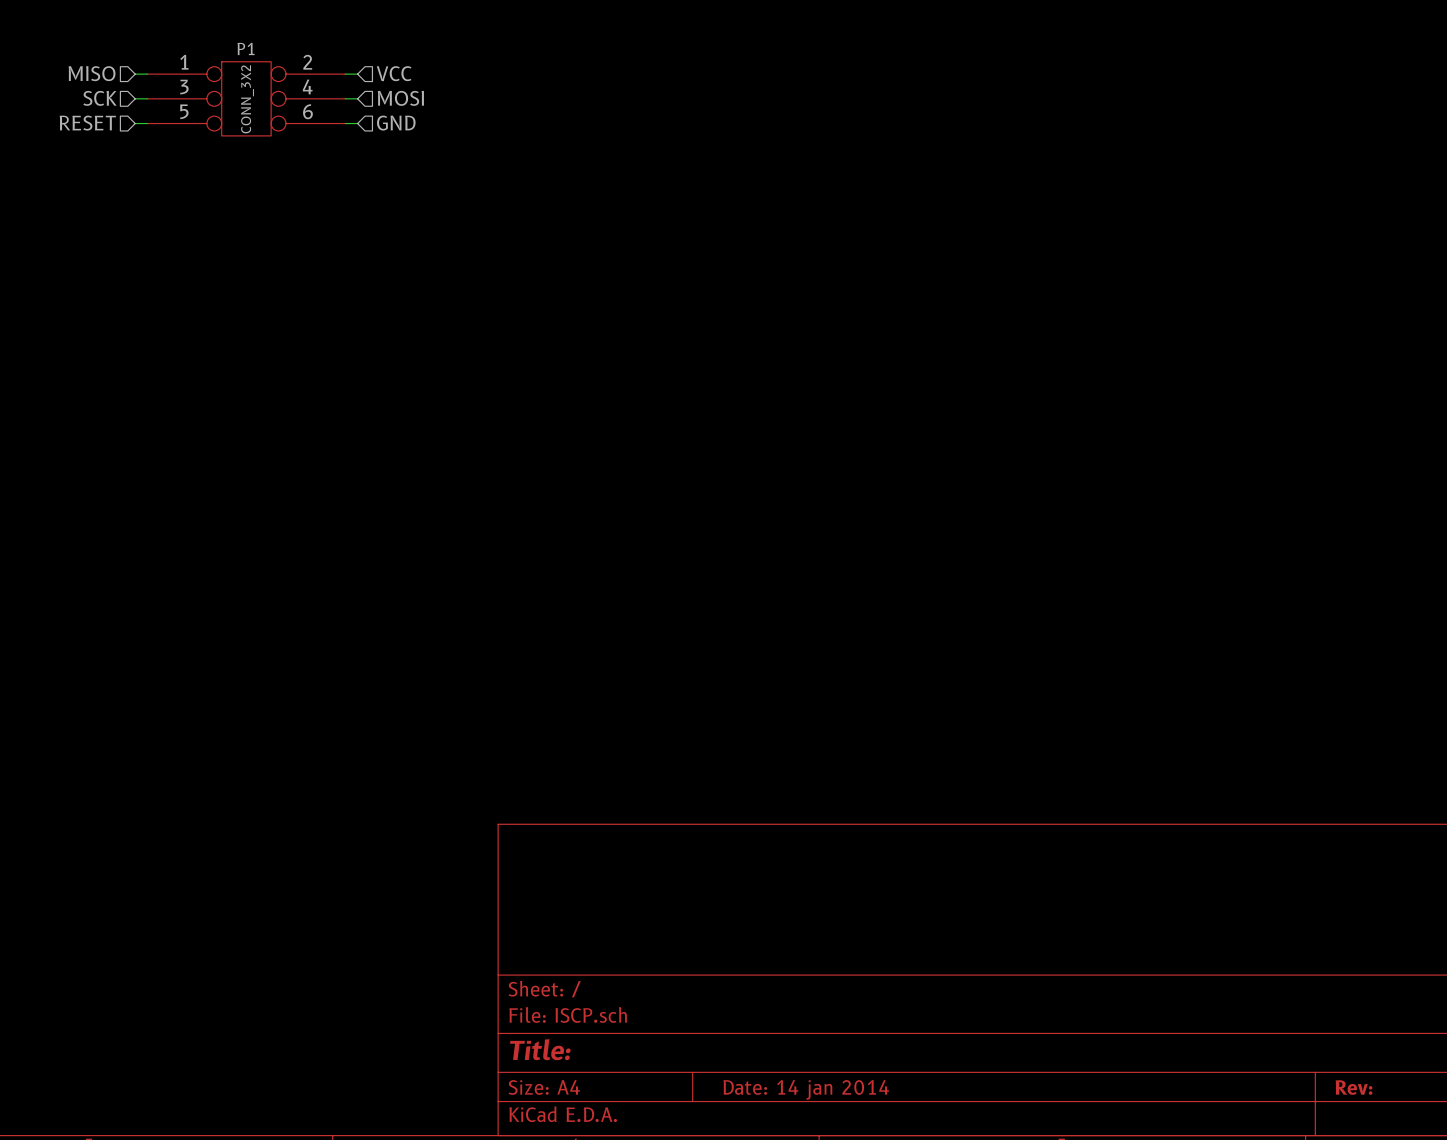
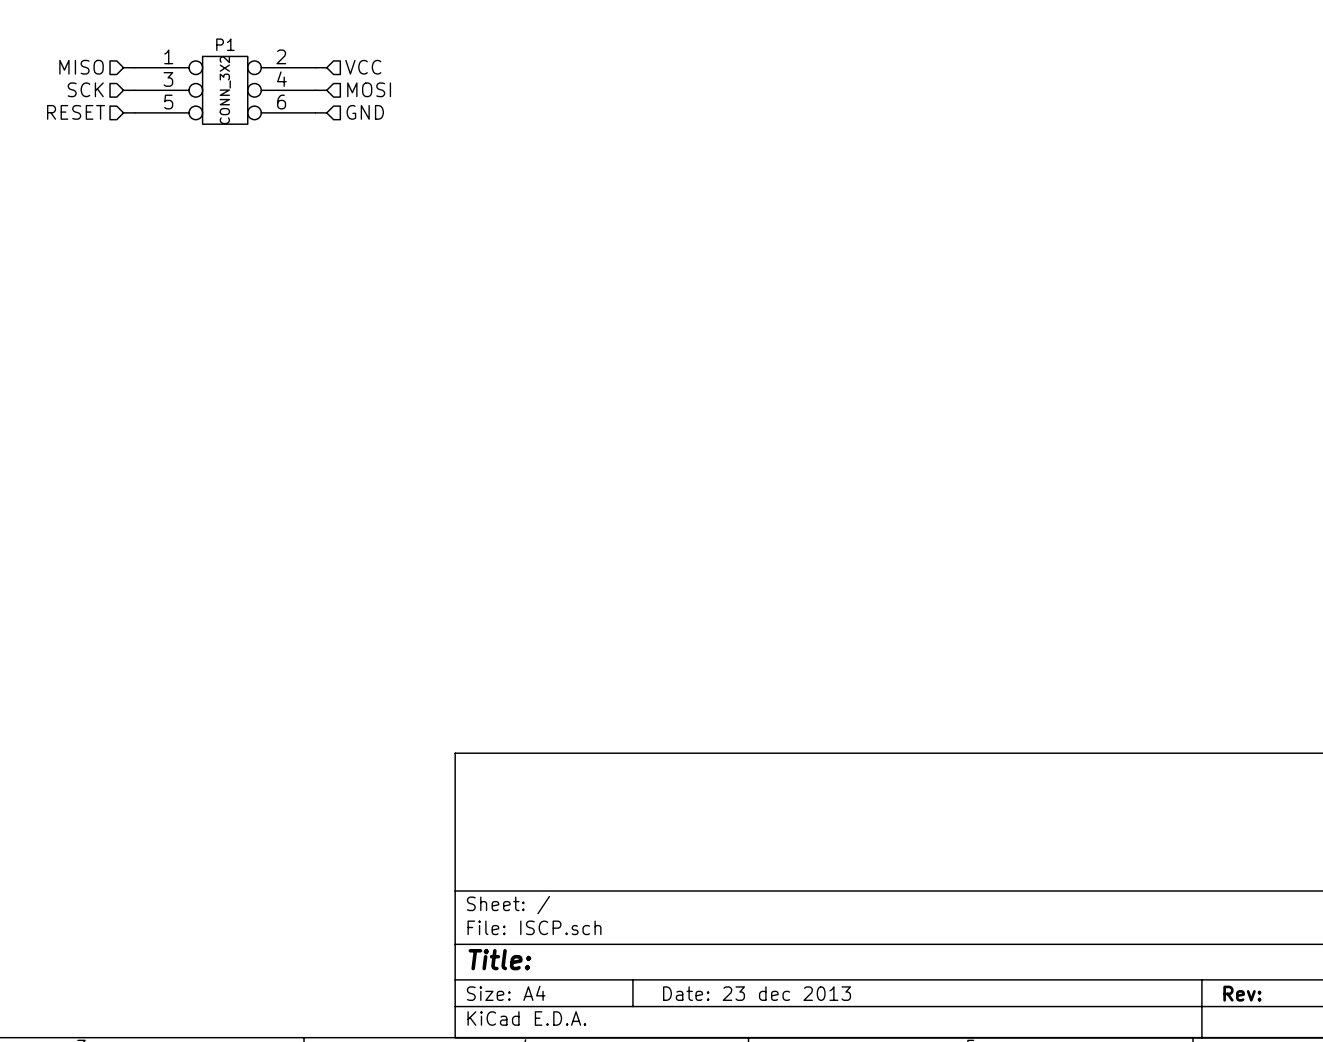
title block: Date: 14 jan 2014 (806, 1089) -> Date: 23 dec 2013 (757, 993)

